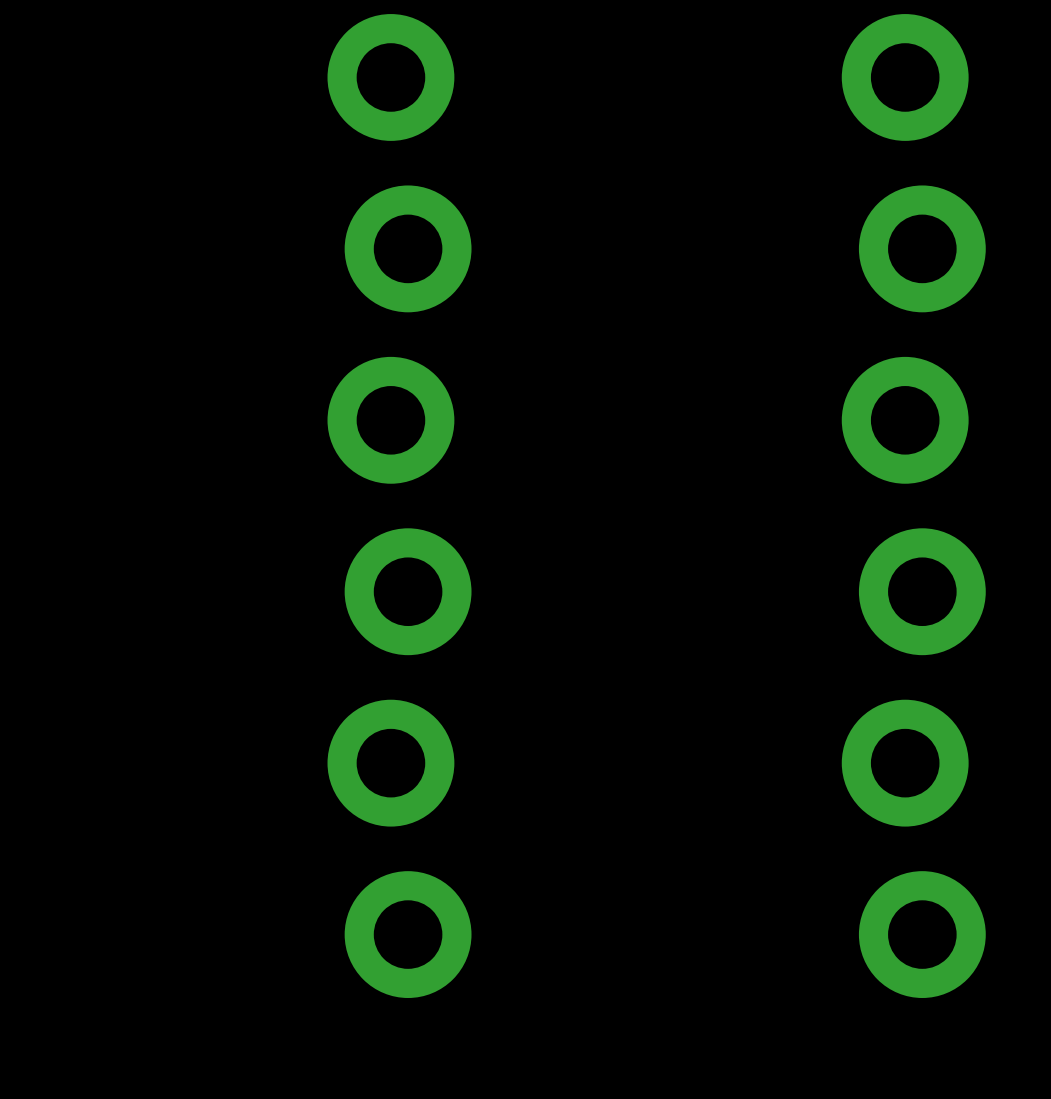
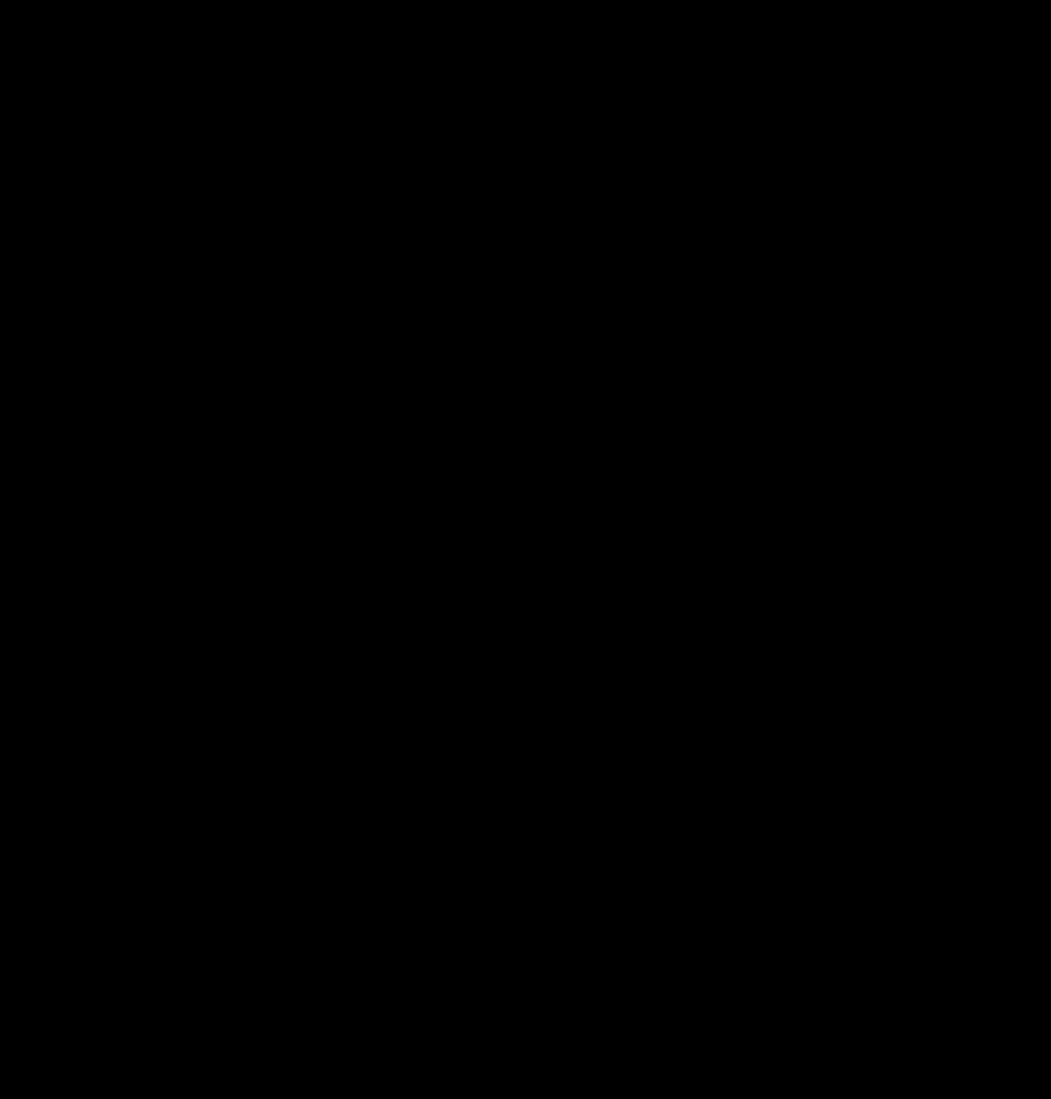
part: (399, 506) -> none
part: (913, 506) -> none

